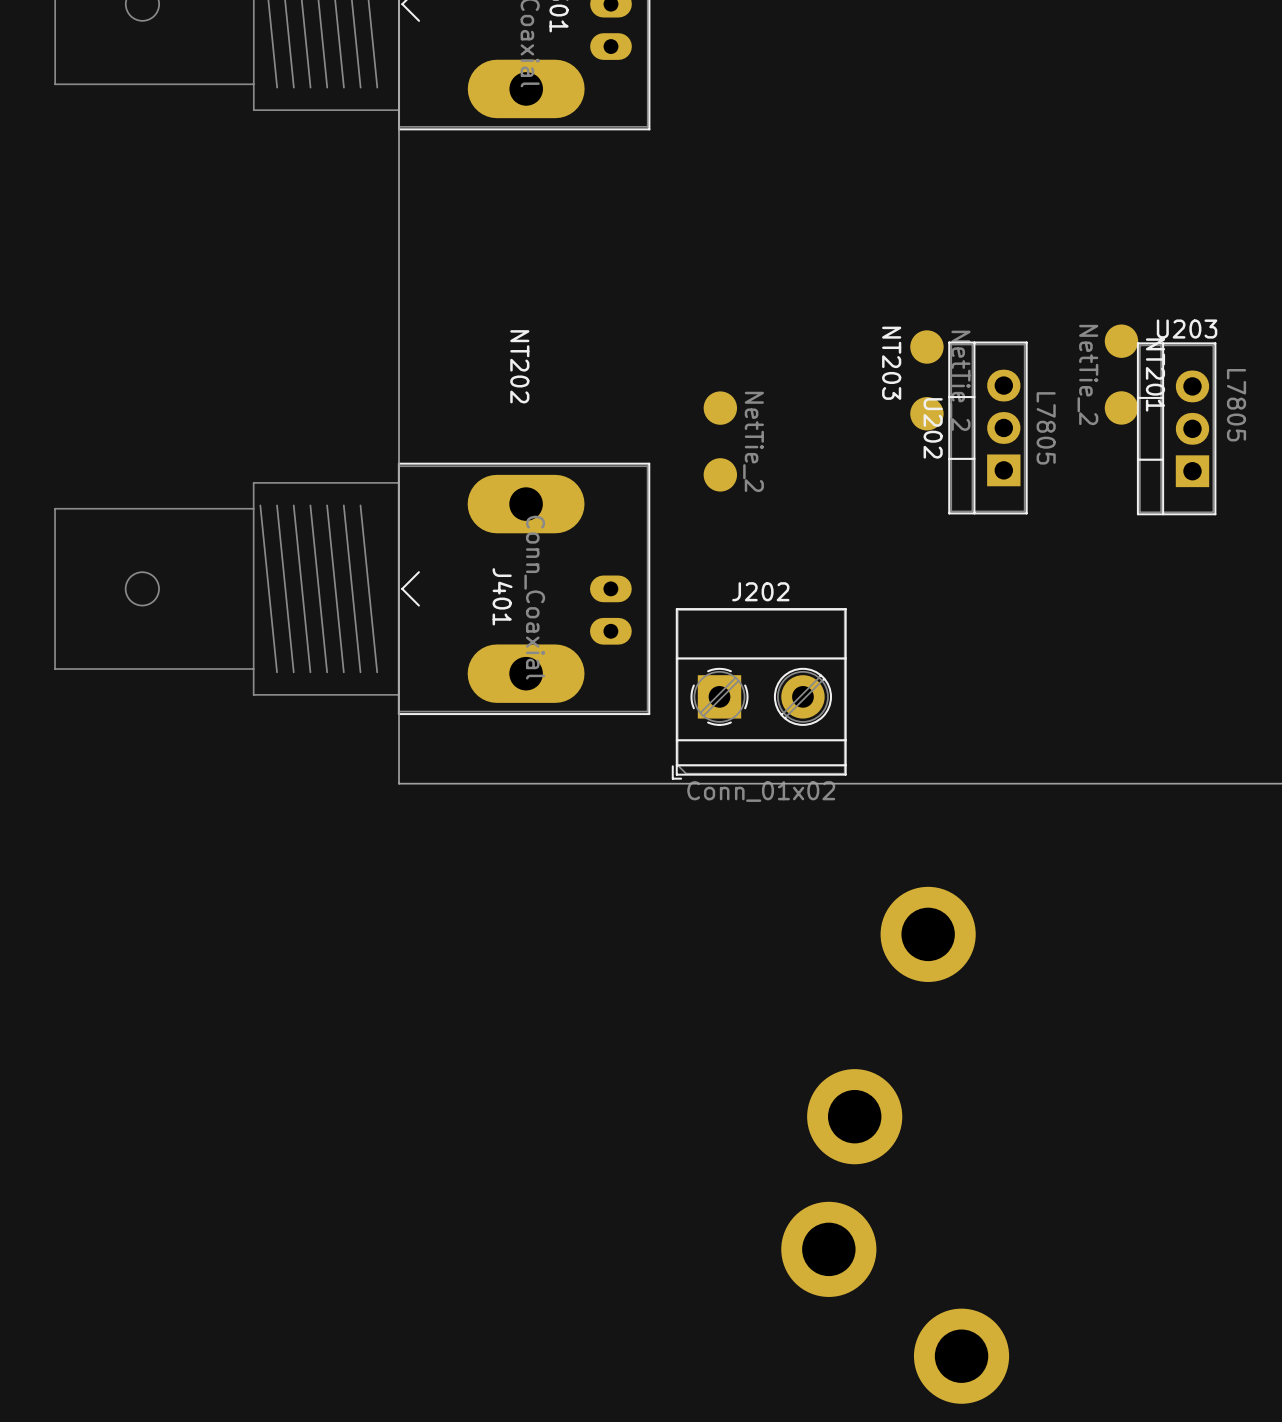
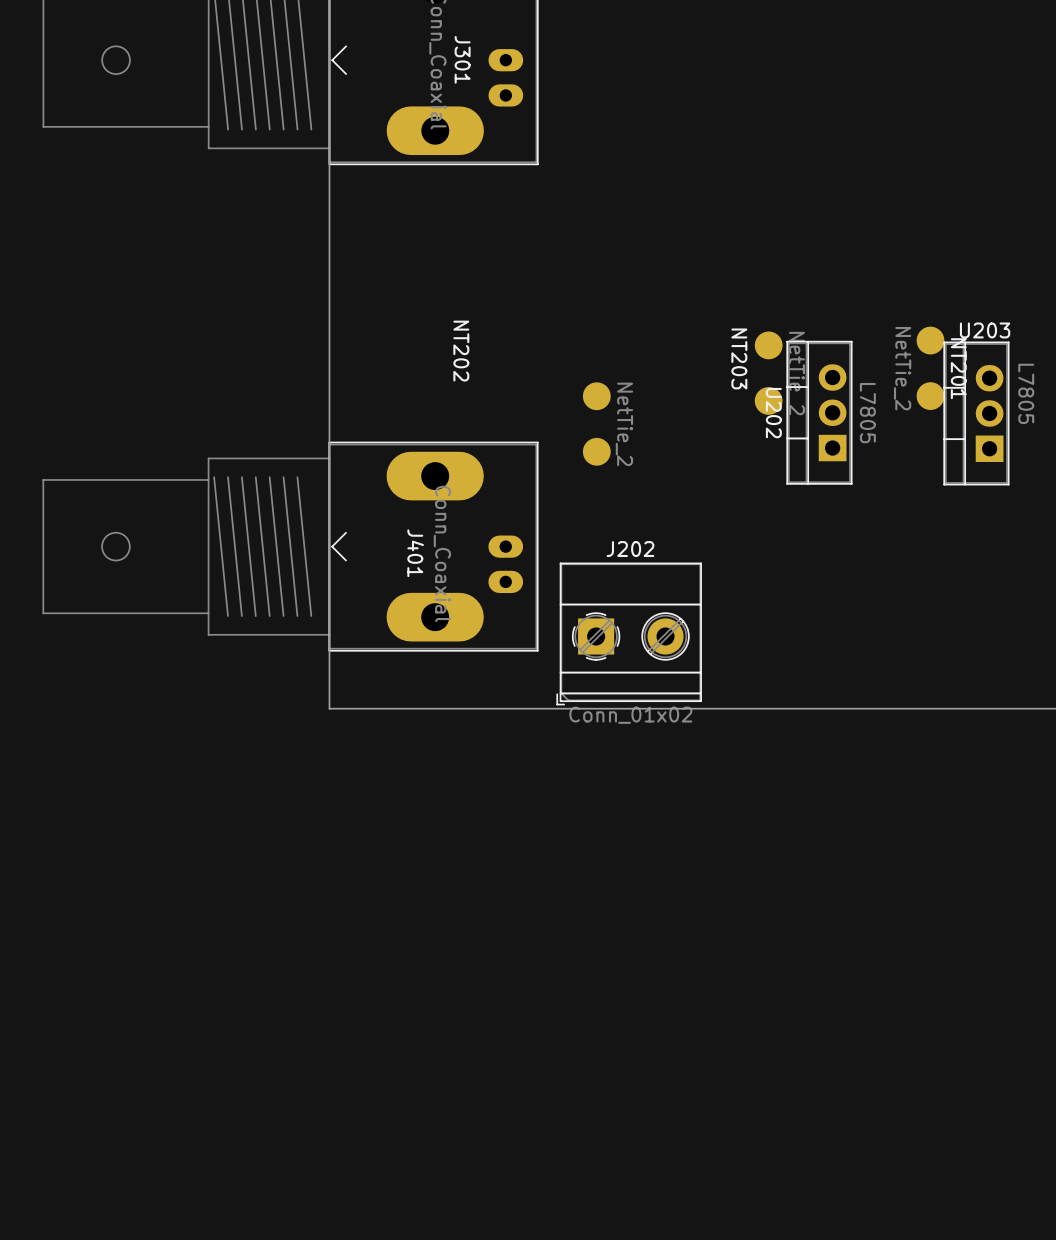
NT202 name position: NT202 (519, 366) -> NT202 (461, 351)
part: (928, 934) -> none
part: (854, 1116) -> none
part: (828, 1249) -> none
part: (961, 1356) -> none

